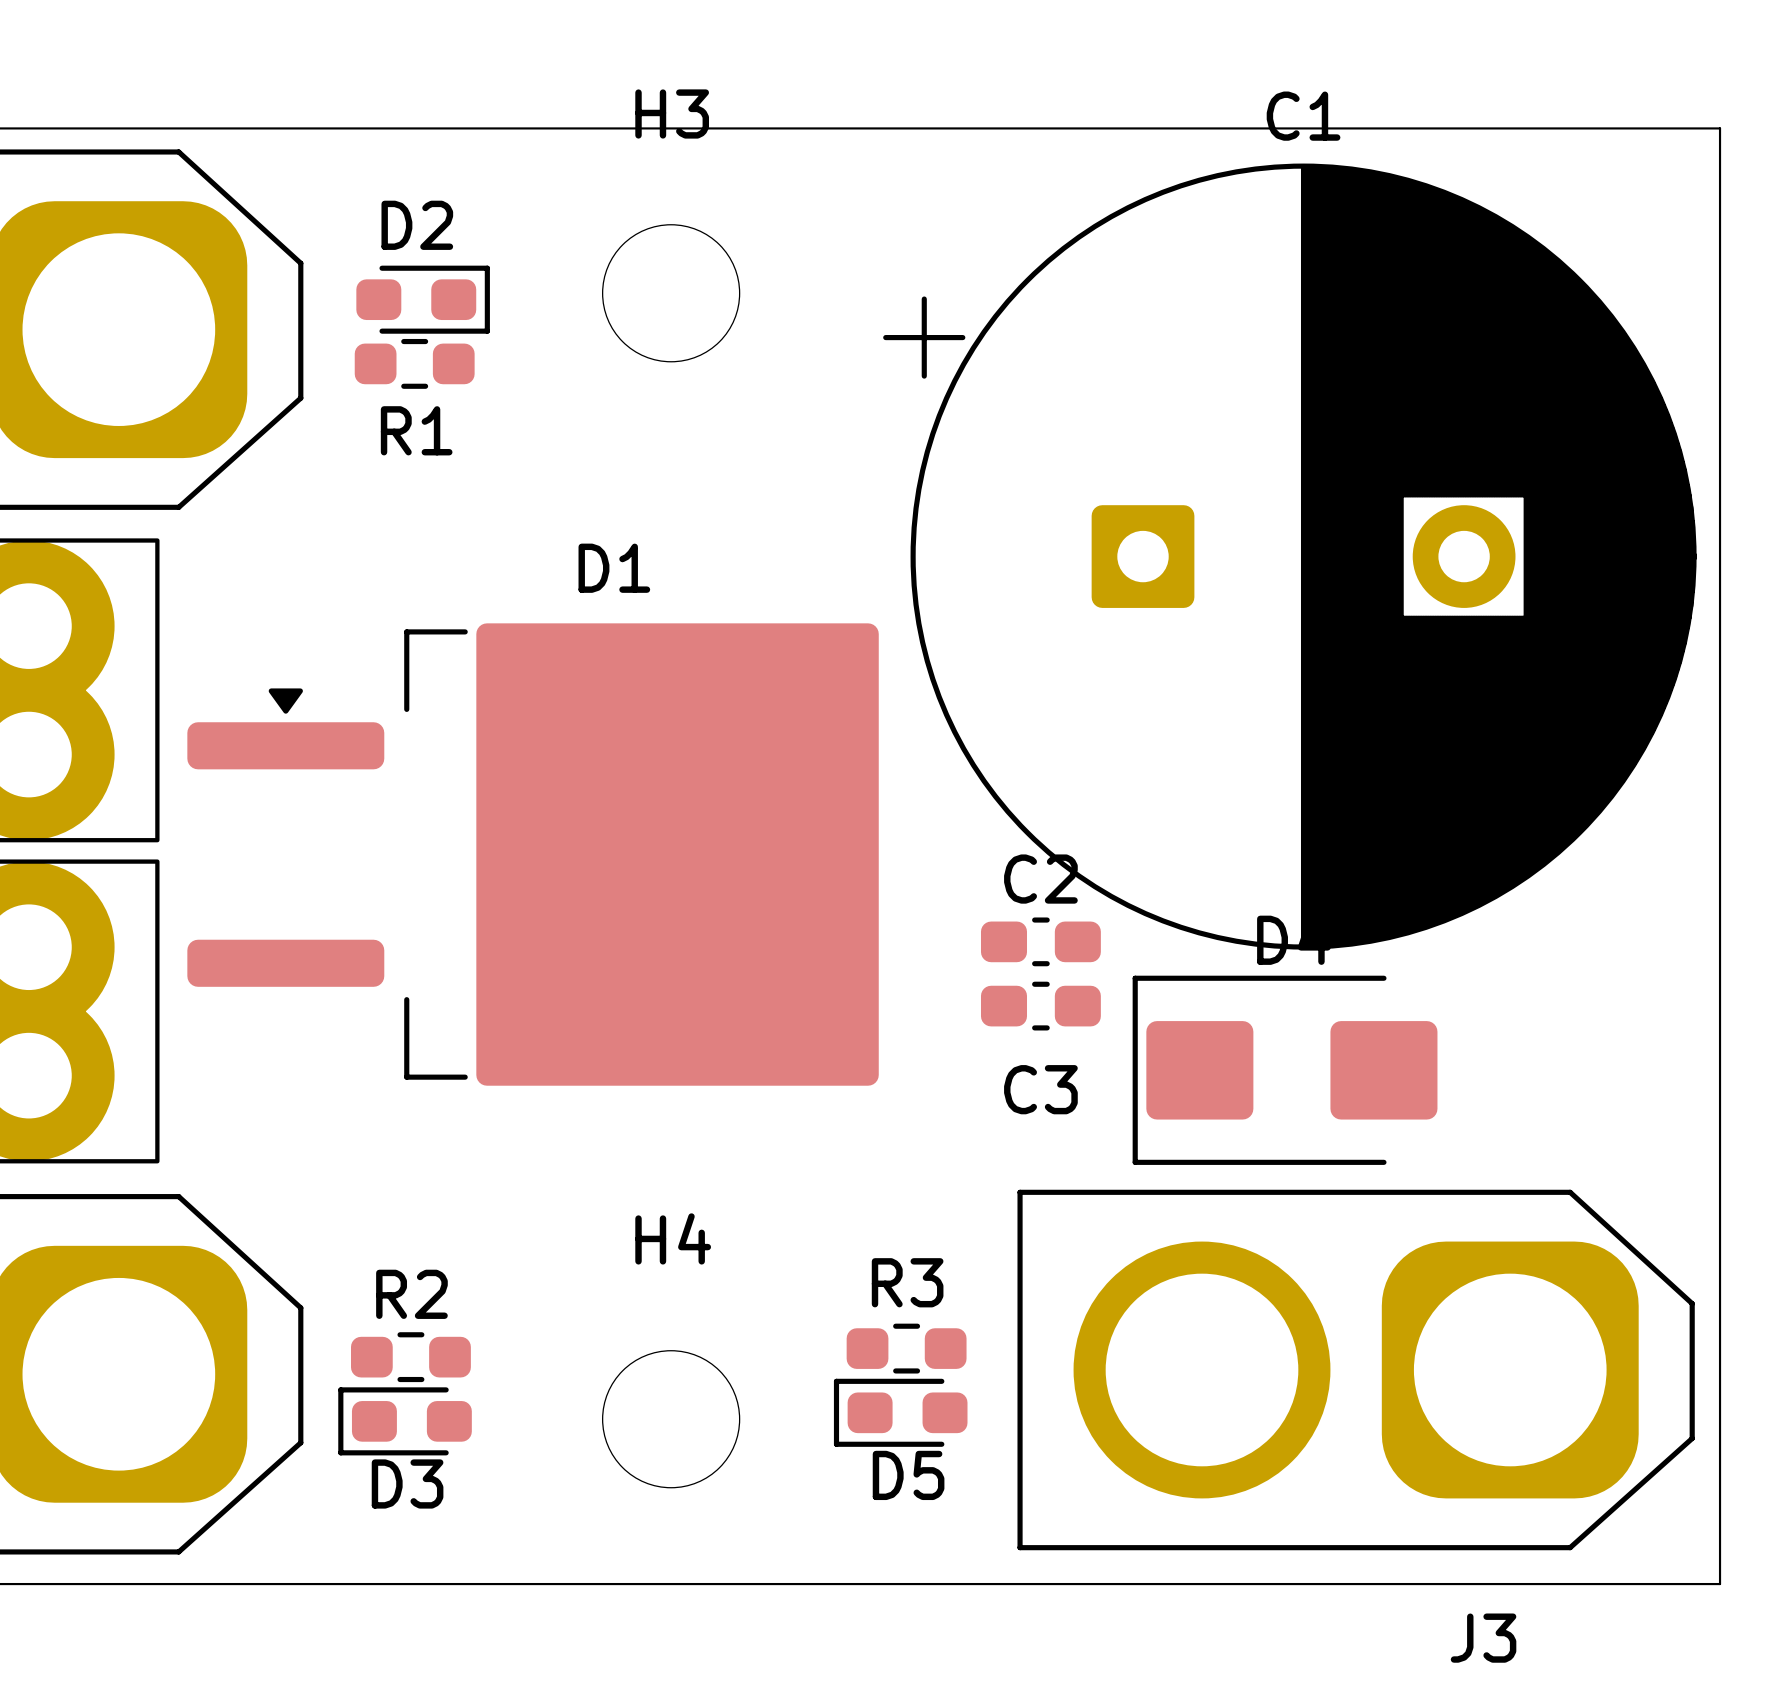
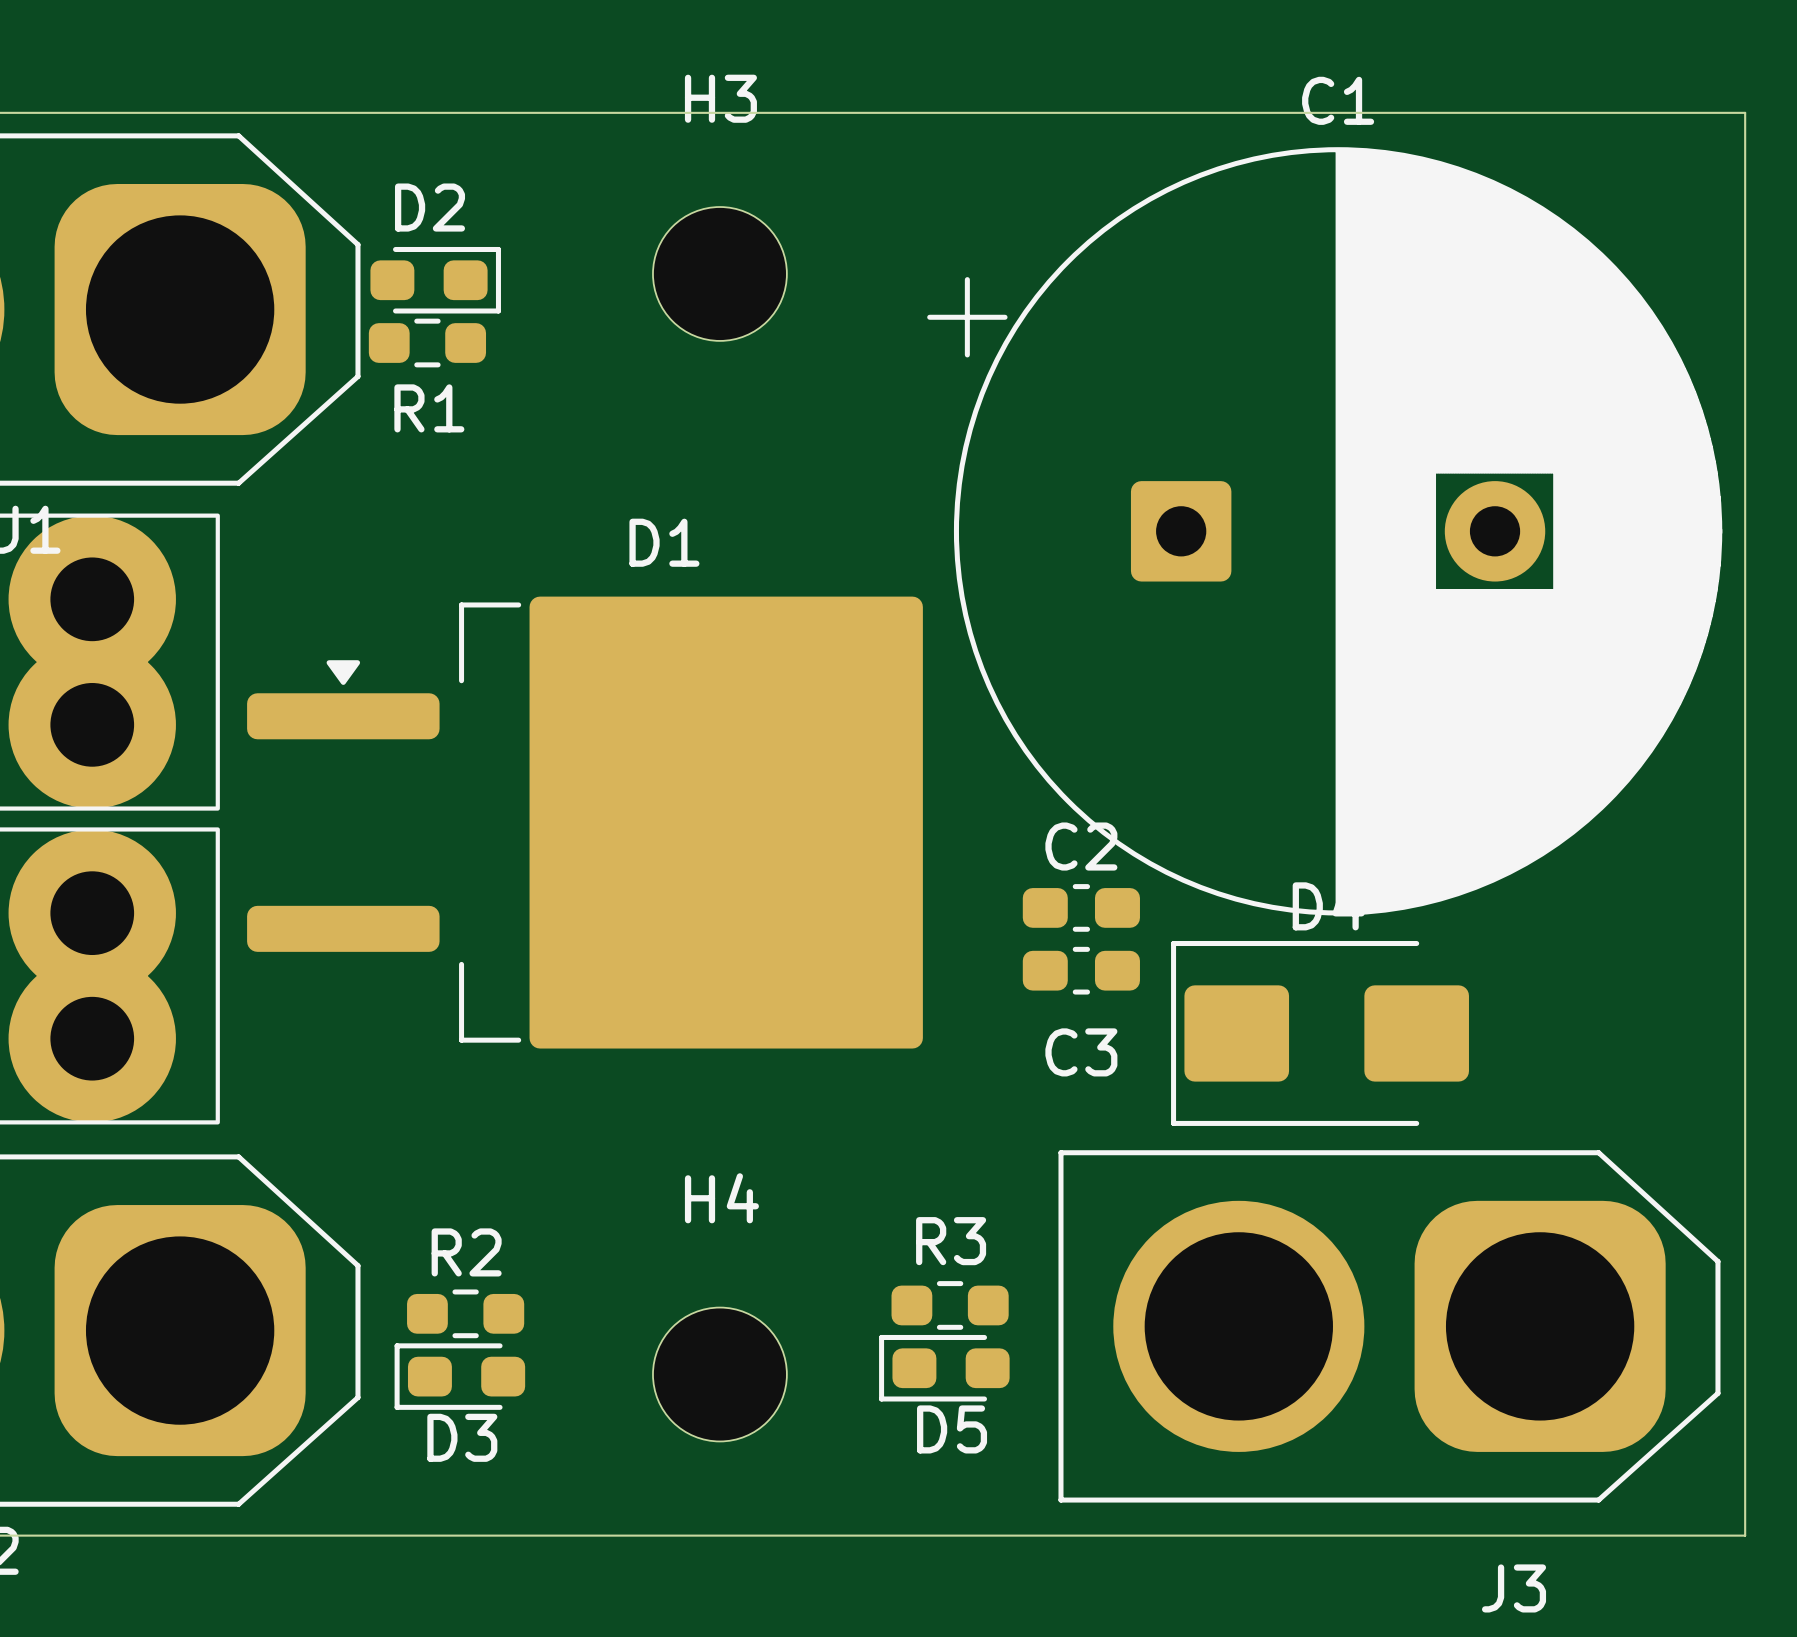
D2 position: (423, 299) -> (435, 280)
R1 position: (414, 363) -> (427, 343)

